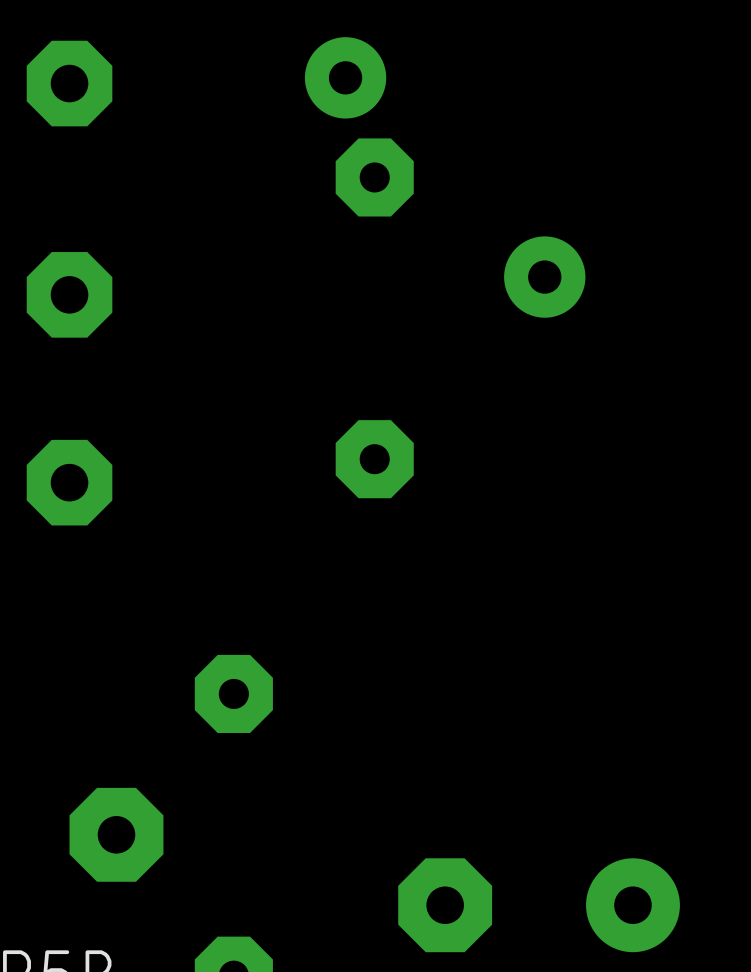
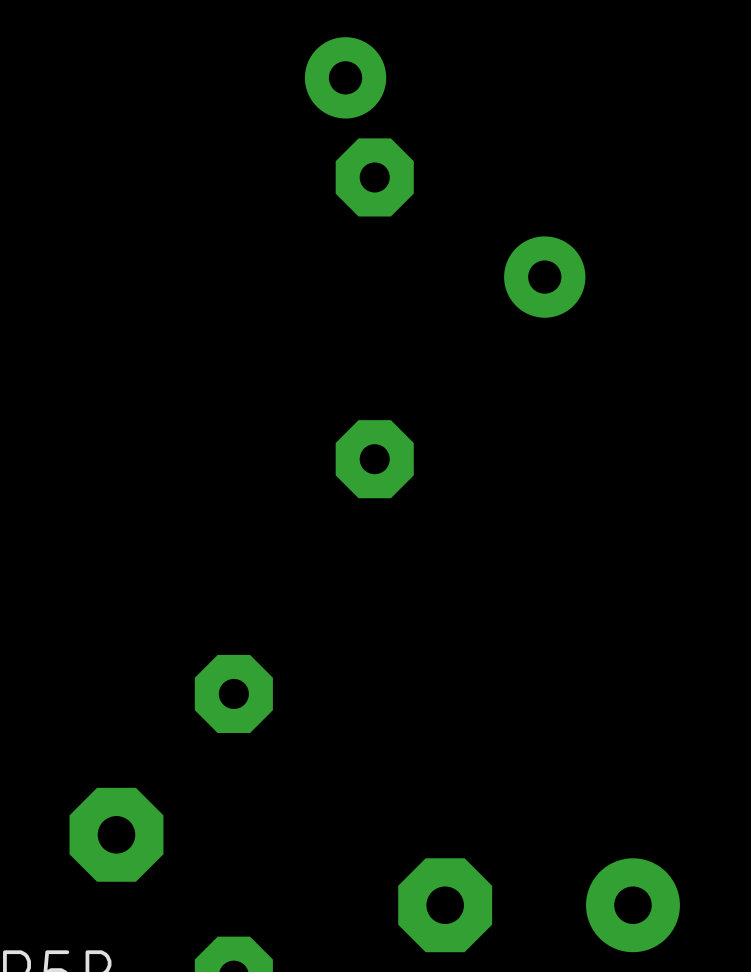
part: (69, 83) -> none
part: (69, 294) -> none
part: (69, 482) -> none

